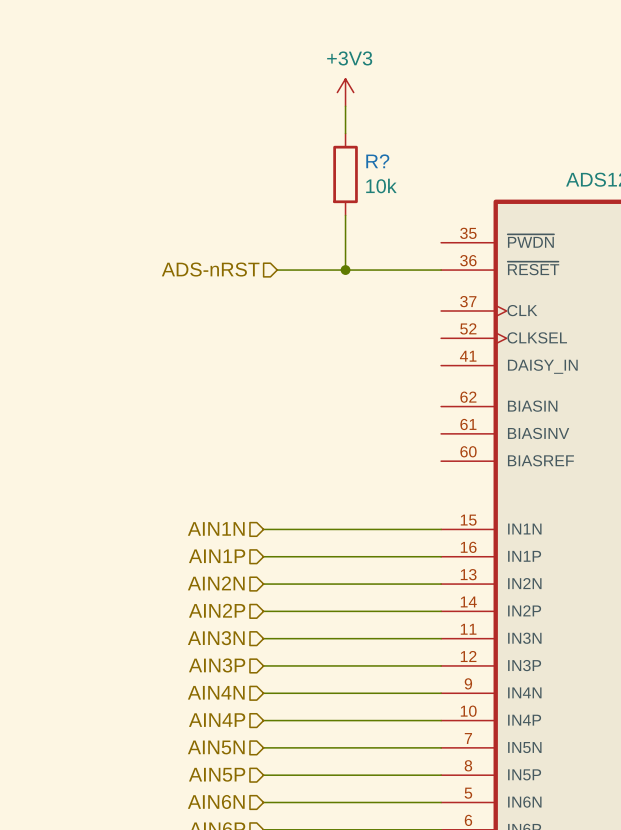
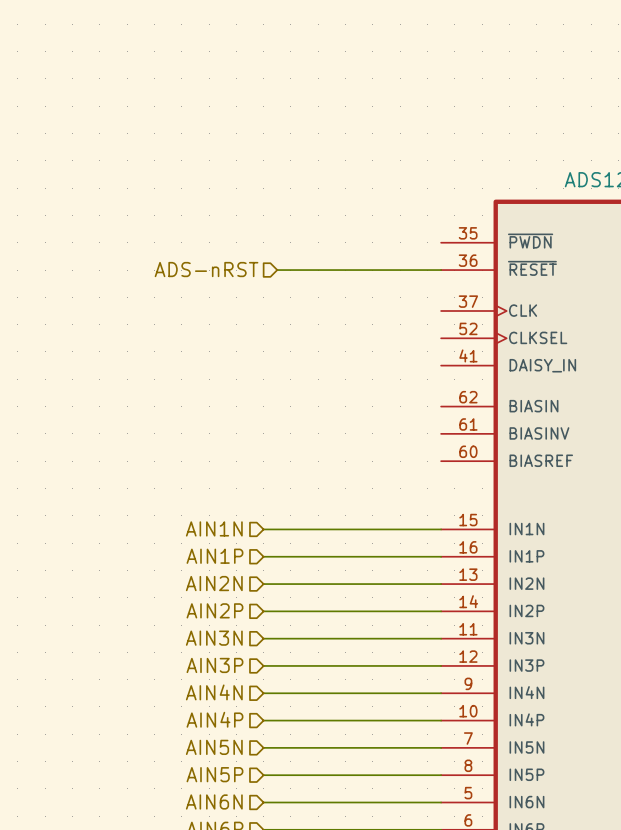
power symbol: +3V3 (345, 92) -> none
wire: (345, 106) (345, 133) -> none
R?: 10k (345, 174) -> none
wire: (345, 215) (345, 270) -> none
junction: (345, 270) -> none

